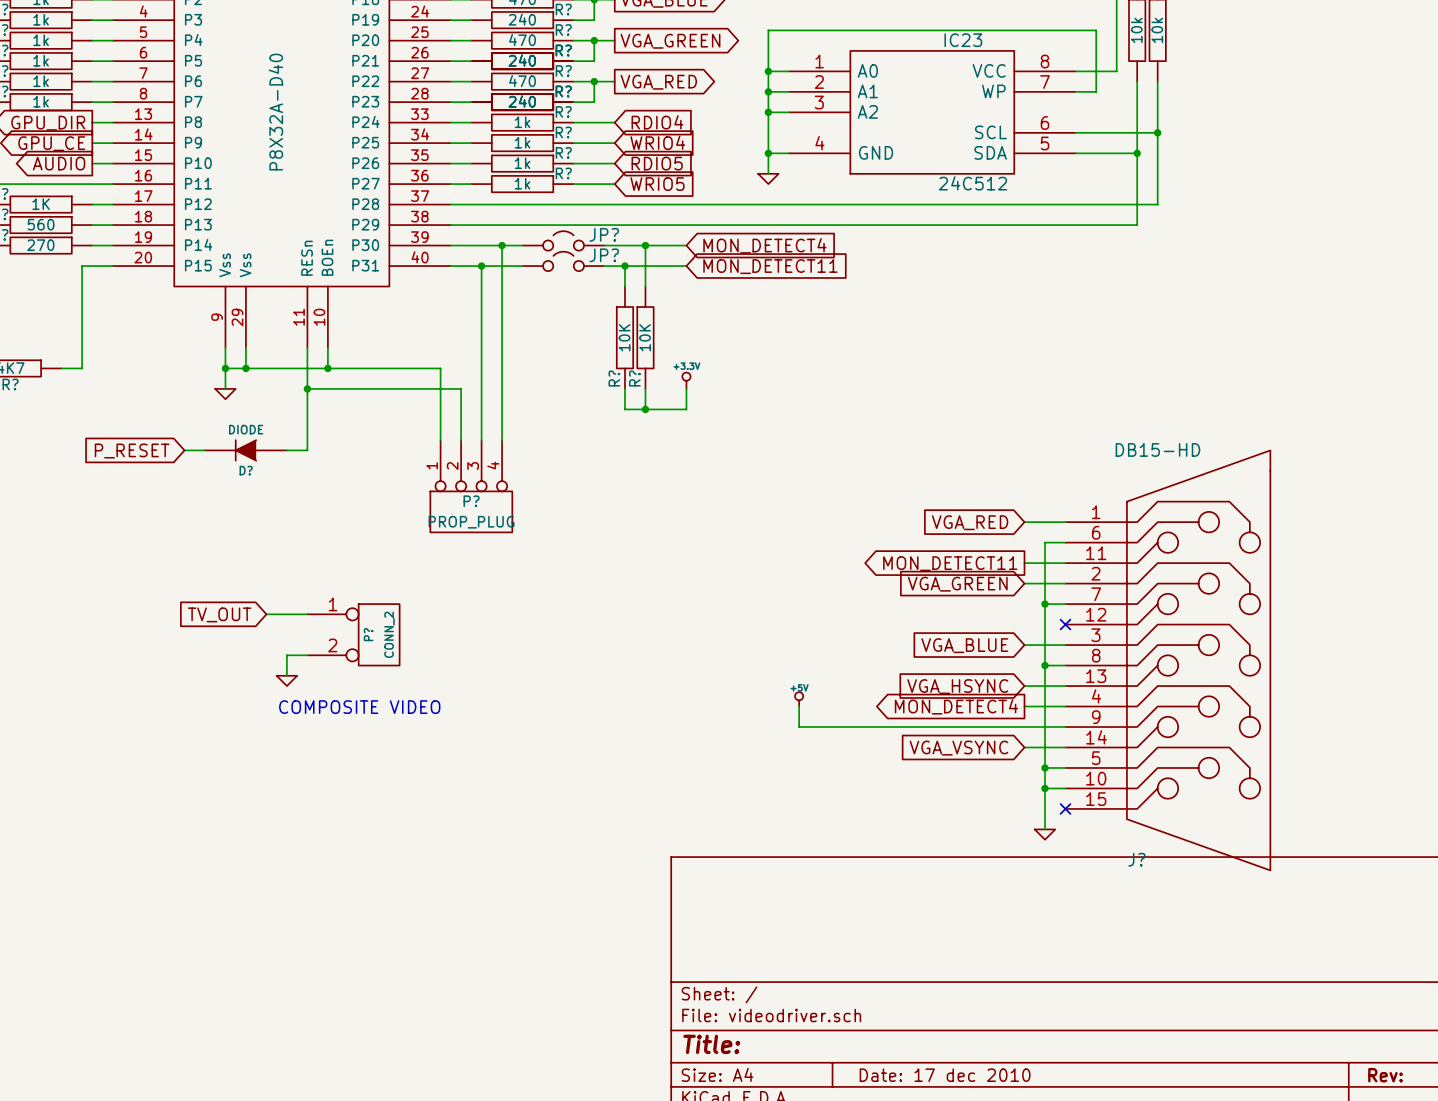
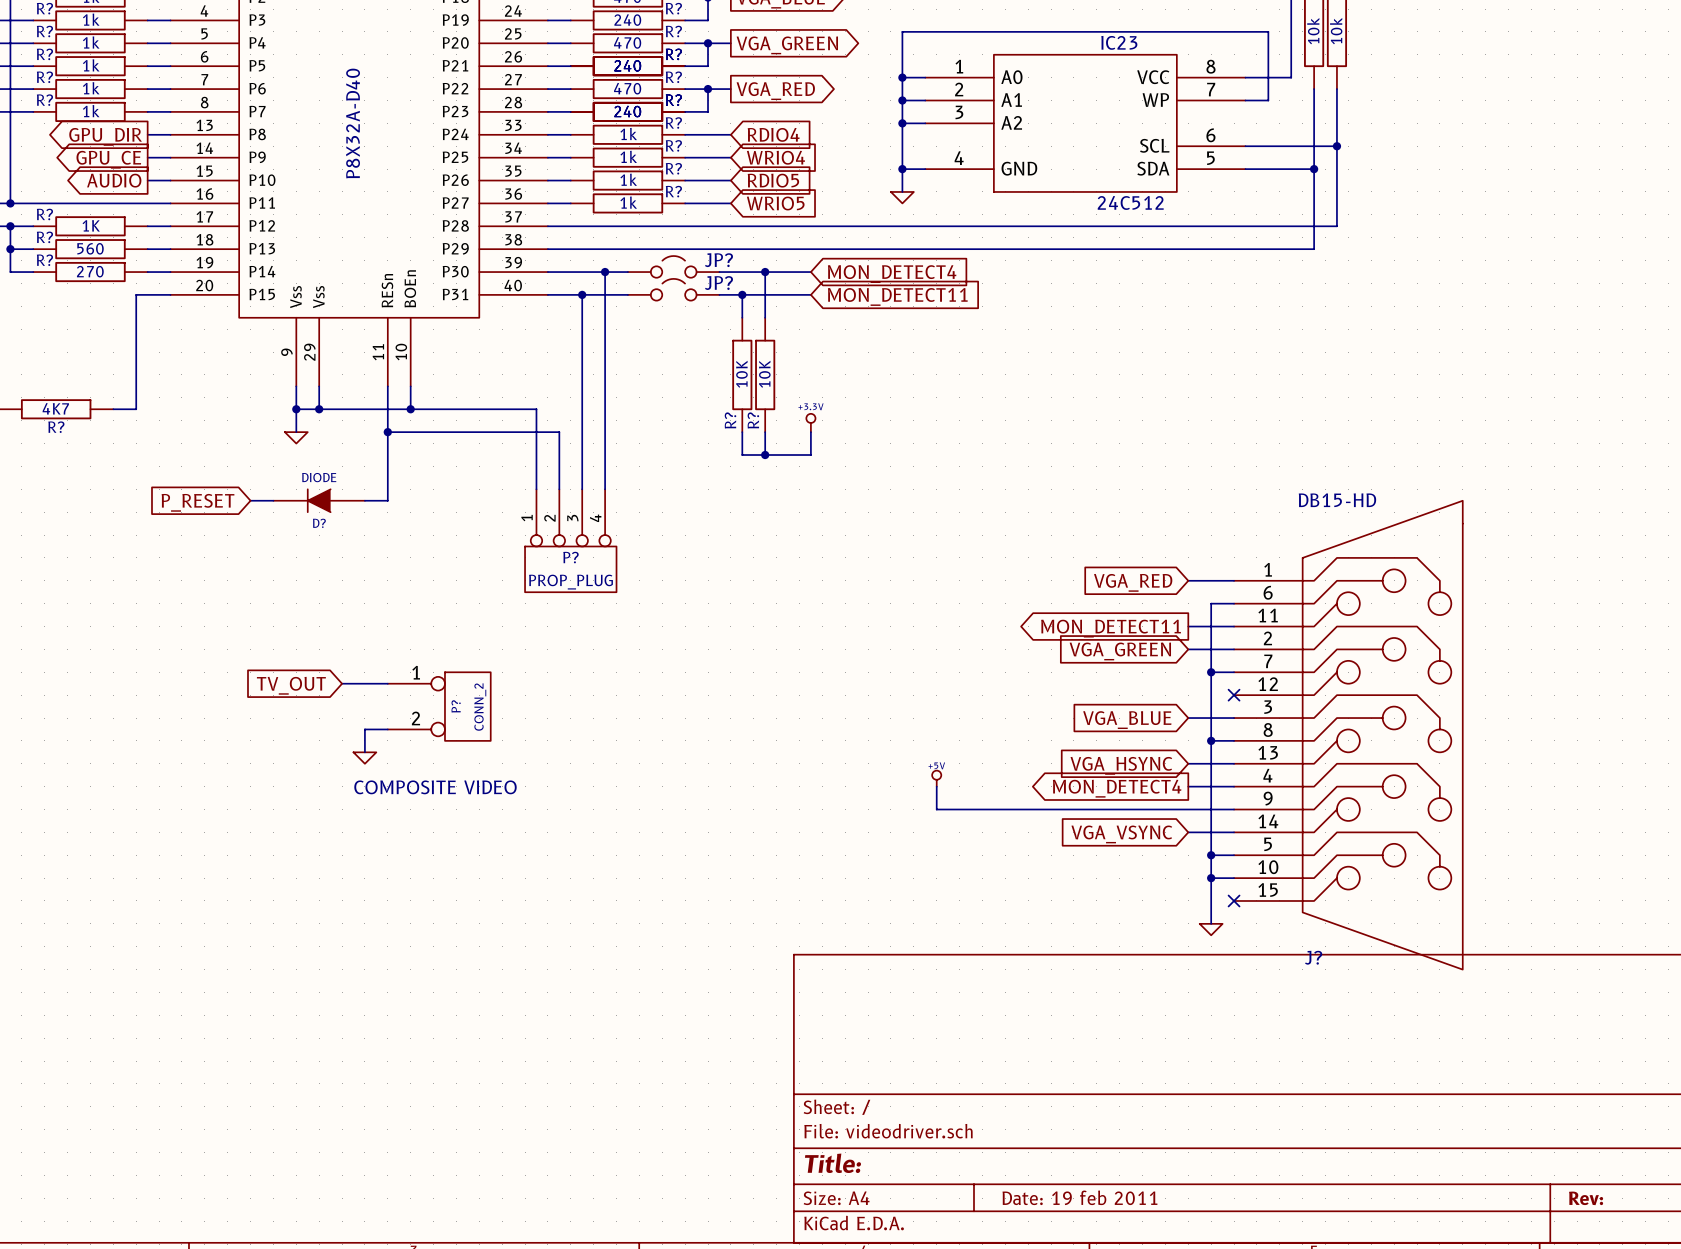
title block: Date: 17 dec 2010 (945, 1075) -> Date: 19 feb 2011 (1079, 1197)

